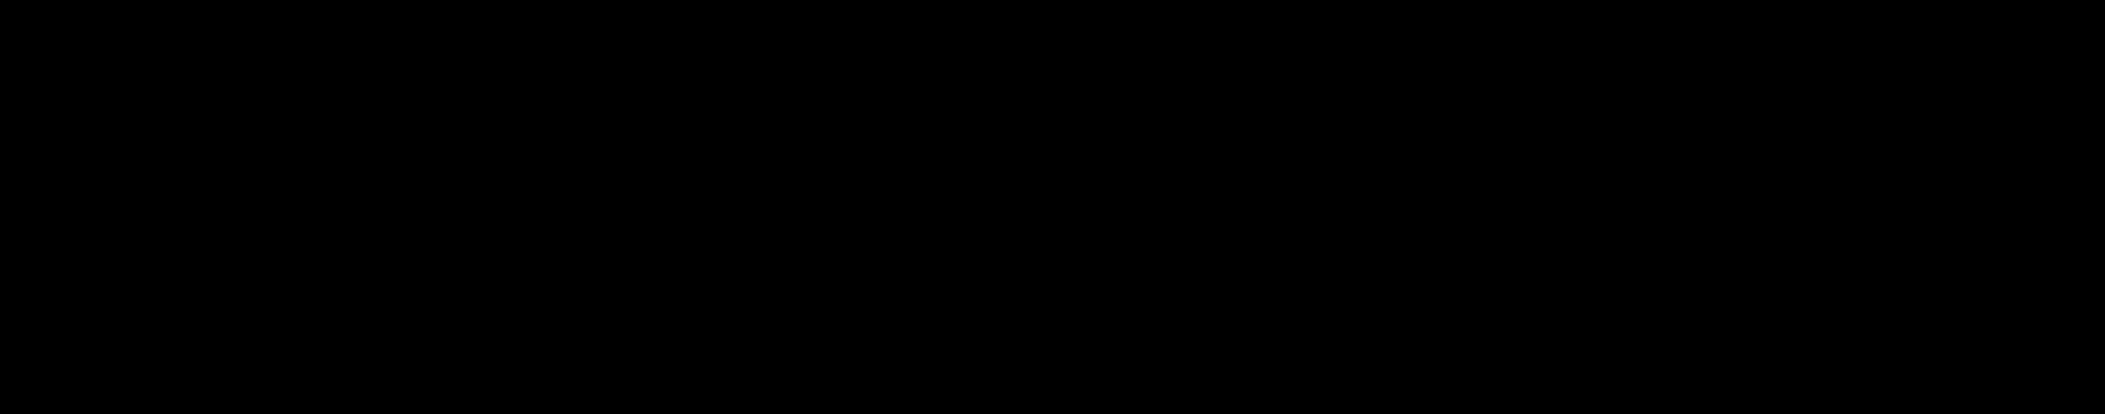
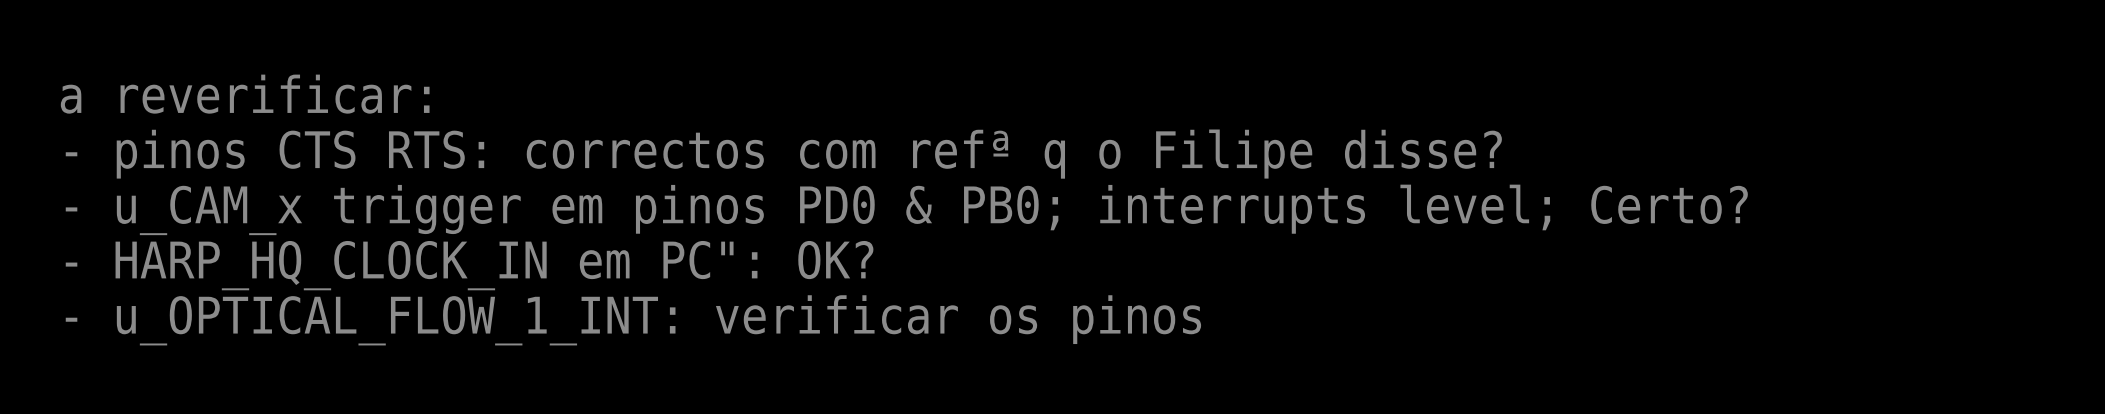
text: none -> a reverificar: (245, 94)
text: none -> - pinos CTS RTS: correctos com refª q o Filipe disse? (783, 154)
text: none -> - u_CAM_x trigger em pinos PD0 & PB0; interrupts level; Certo? (906, 209)
text: none -> - HARP_HQ_CLOCK_IN em PC": OK? (469, 265)
text: none -> - u_OPTICAL_FLOW_1_INT: verificar os pinos (633, 320)

